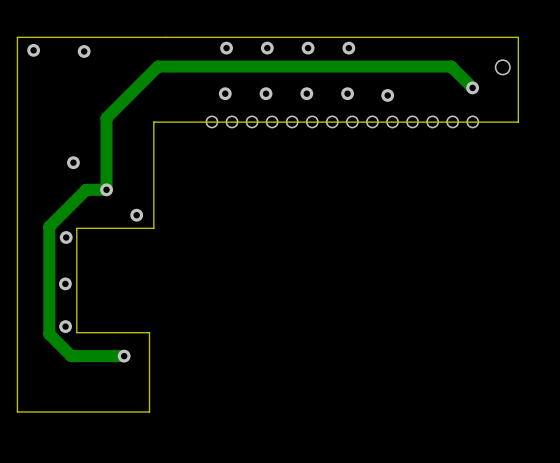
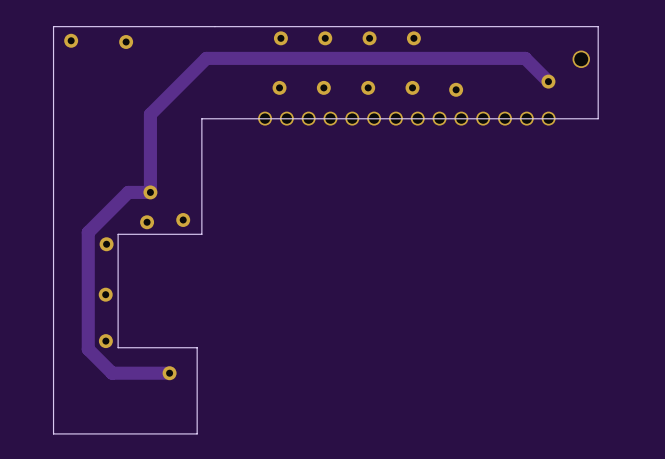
via position: (73, 162) -> (147, 222)

